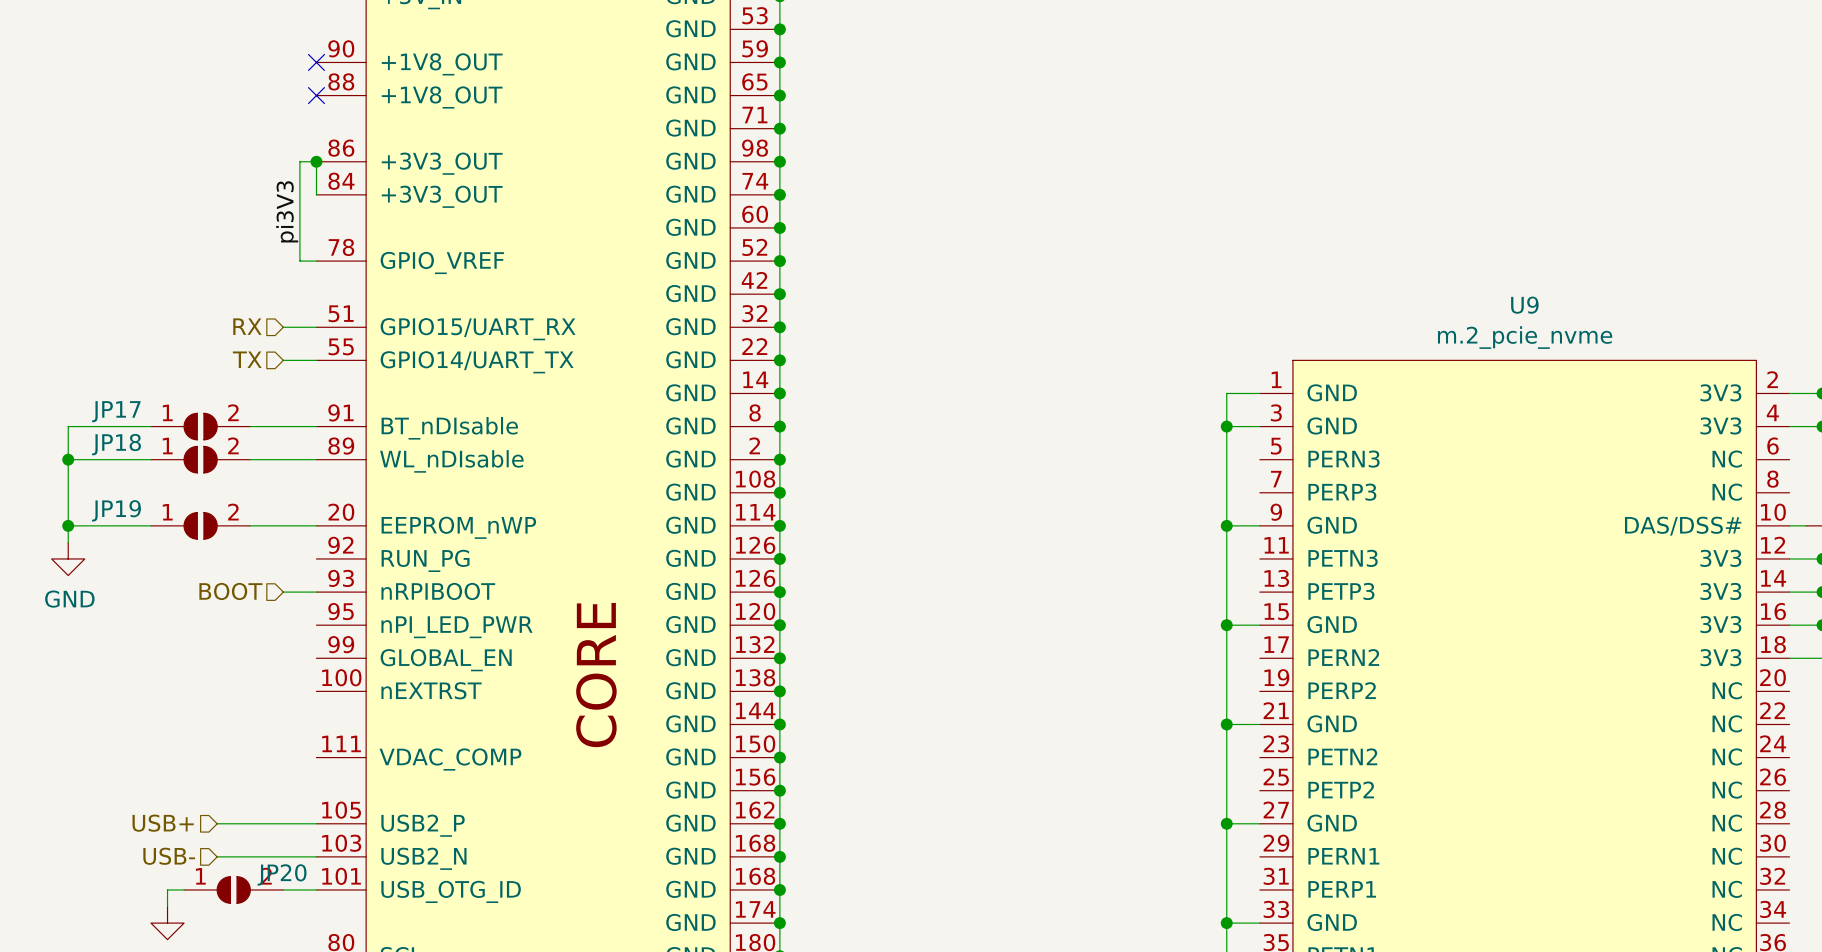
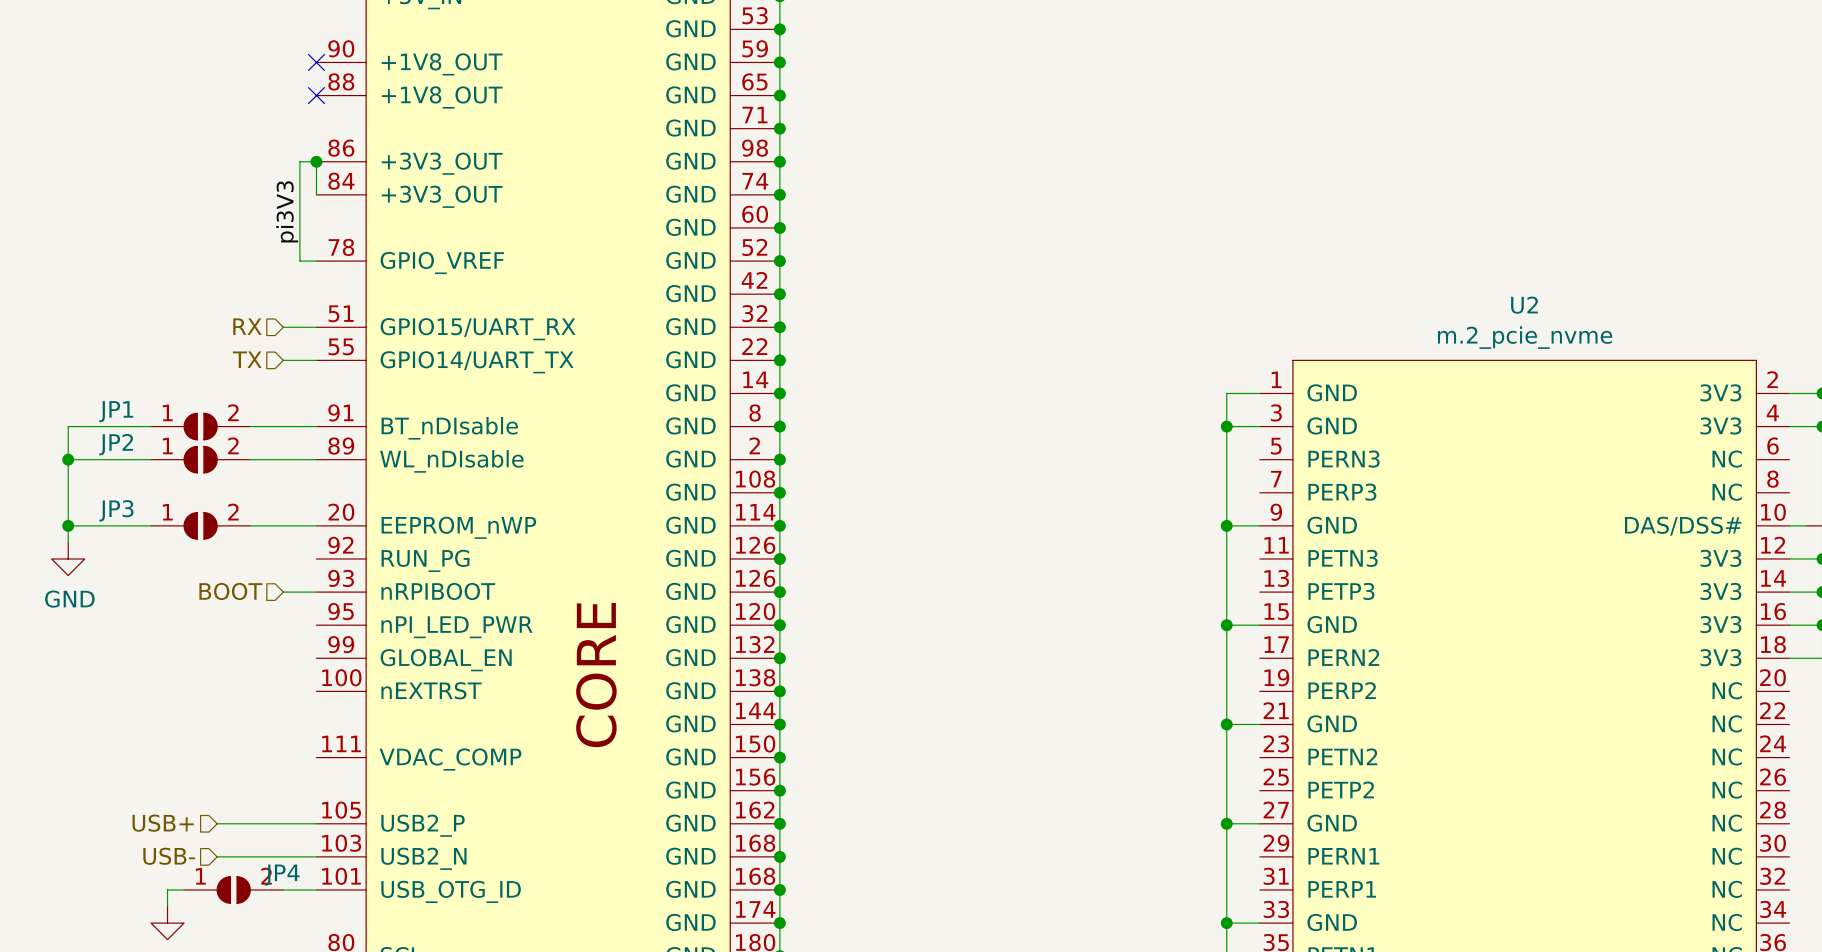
U9 name: U9 (1524, 305) -> U2 (1524, 305)
JP17 name: JP17 (116, 411) -> JP1 (116, 411)
JP18 name: JP18 (116, 444) -> JP2 (116, 444)
JP19 name: JP19 (116, 510) -> JP3 (116, 510)
JP20 name: JP20 (282, 874) -> JP4 (282, 875)

